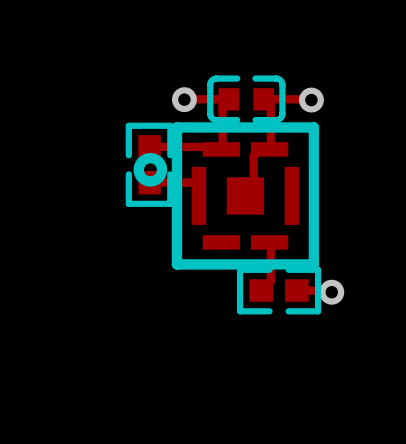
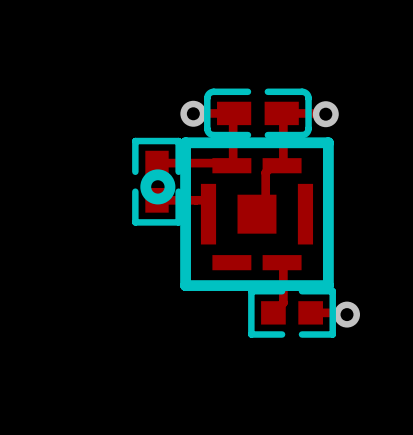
part footprint: [207, 75, 286, 124] -> [204, 88, 312, 139]

